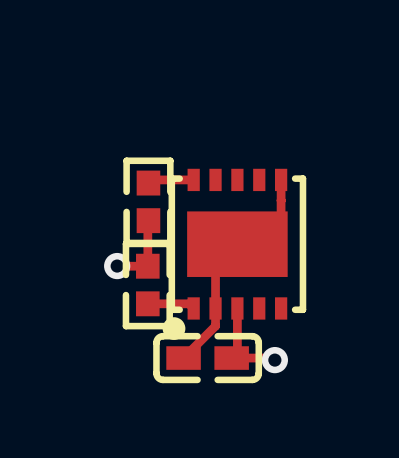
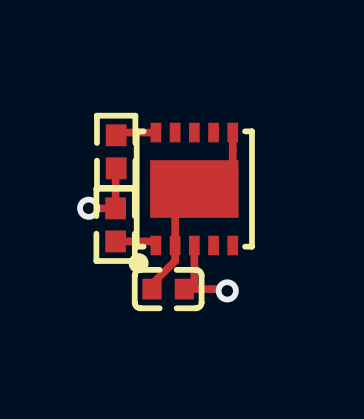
part footprint: [153, 332, 263, 384] -> [131, 266, 205, 312]

